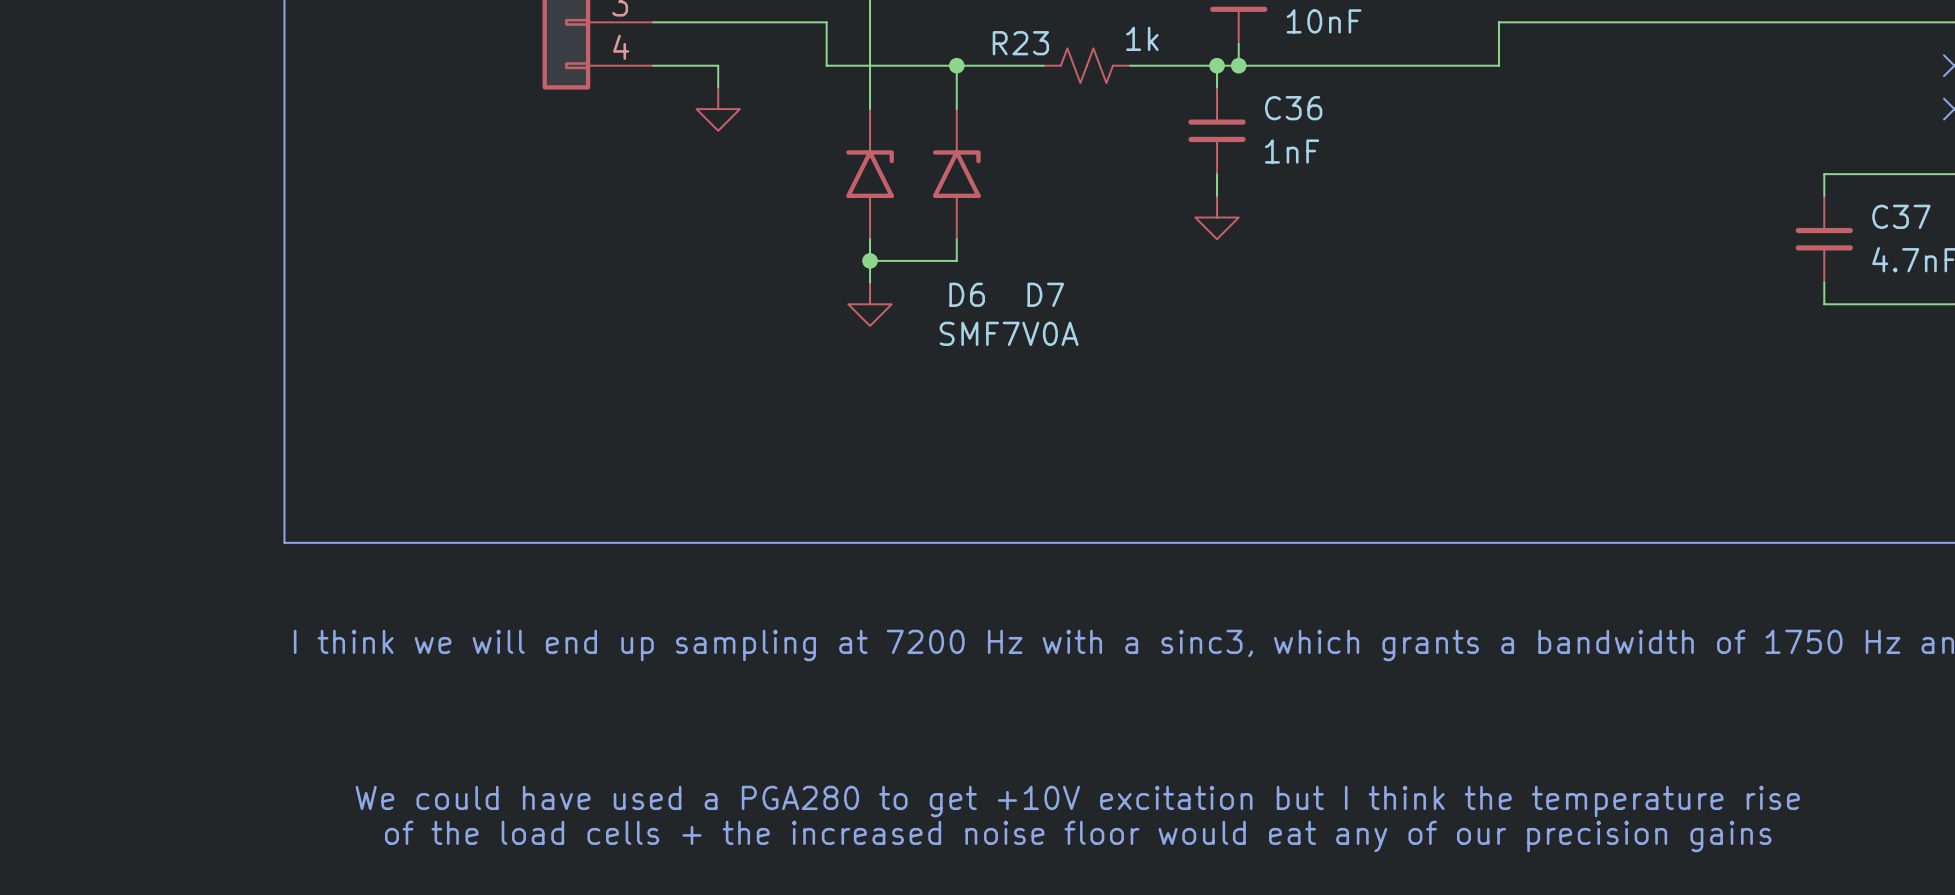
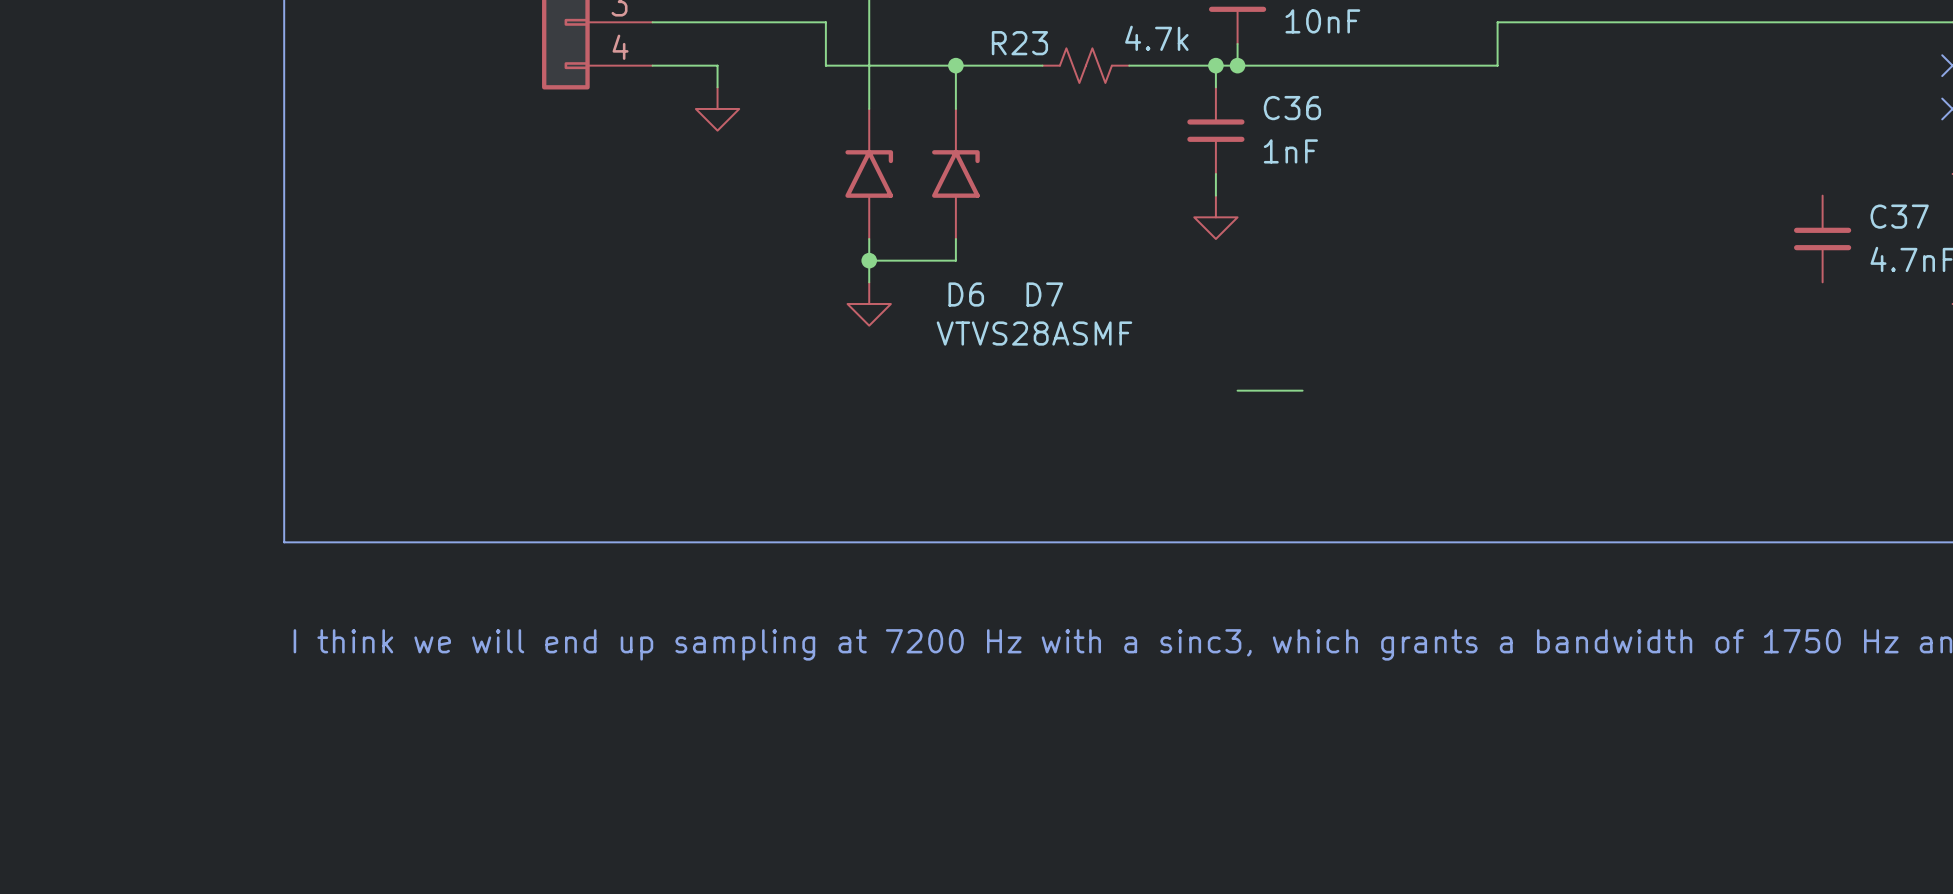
R23 value: 1k (1142, 38) -> 4.7k (1156, 38)
wire: (1954, 174) (1824, 174) (1824, 195) -> none
wire: (1824, 282) (1824, 304) (1954, 304) -> none
D7 value: SMF7V0A (1009, 333) -> VTVS28ASMF (1034, 333)
wire: none -> (1237, 390) (1302, 390)
text: We could have used a PGA280 to get +10V excitation but I think the temperature rise (1077, 801) -> none
text: of the load cells + the increased noise floor would eat any of our precision gains (1078, 836) -> none

